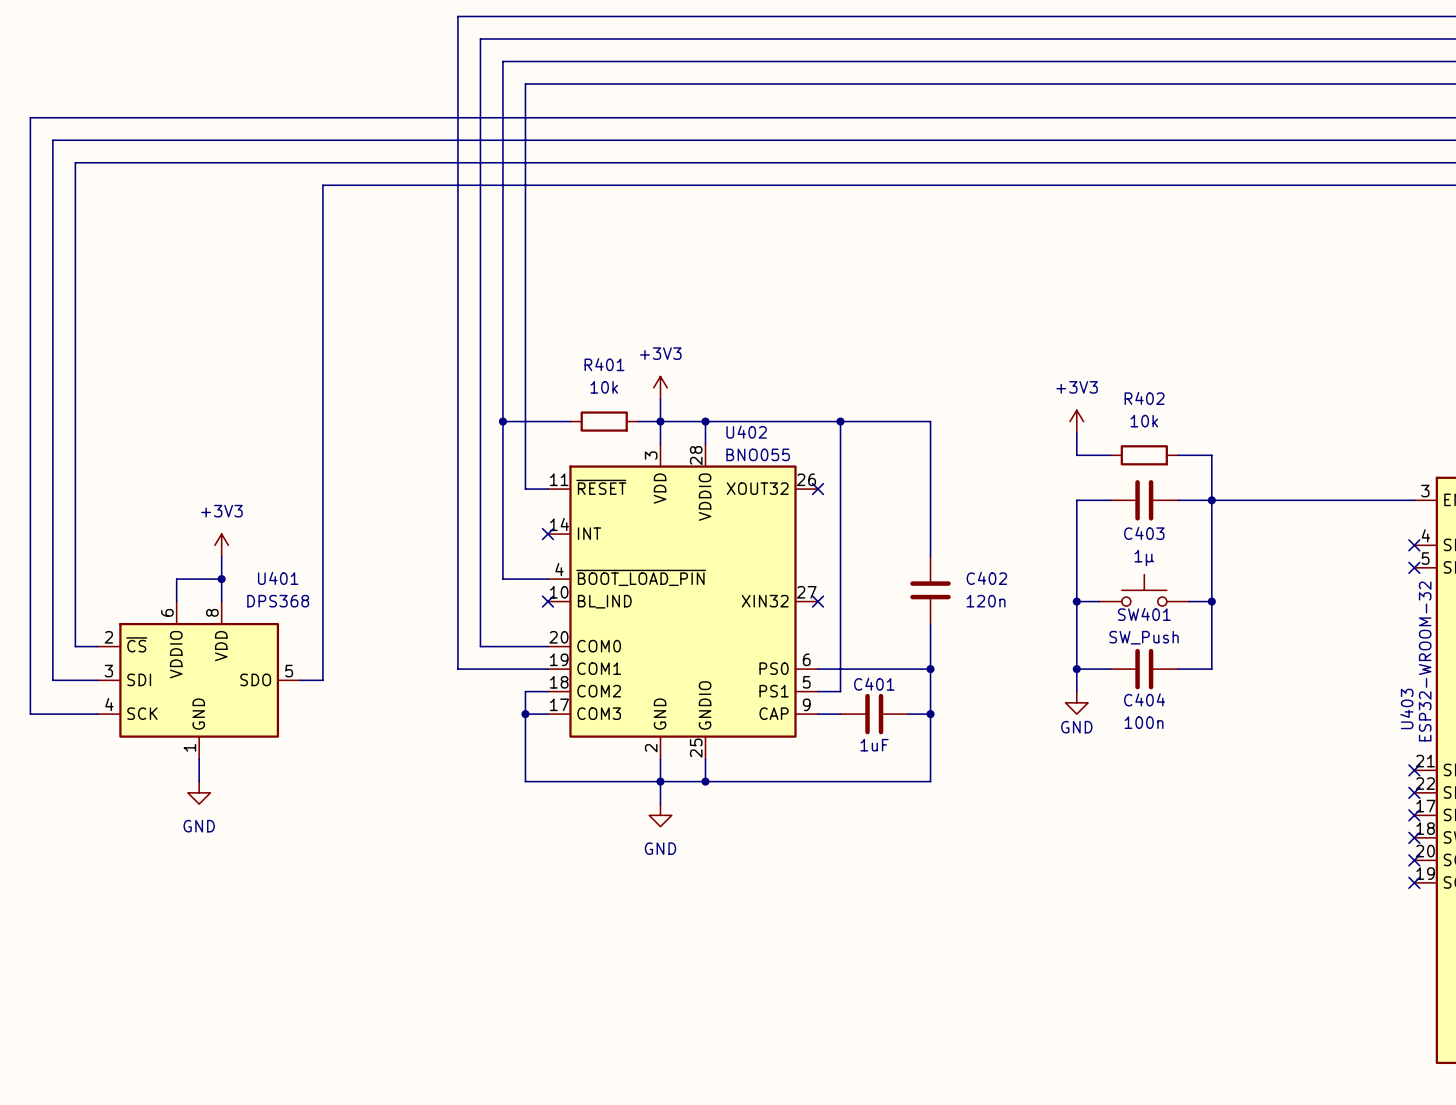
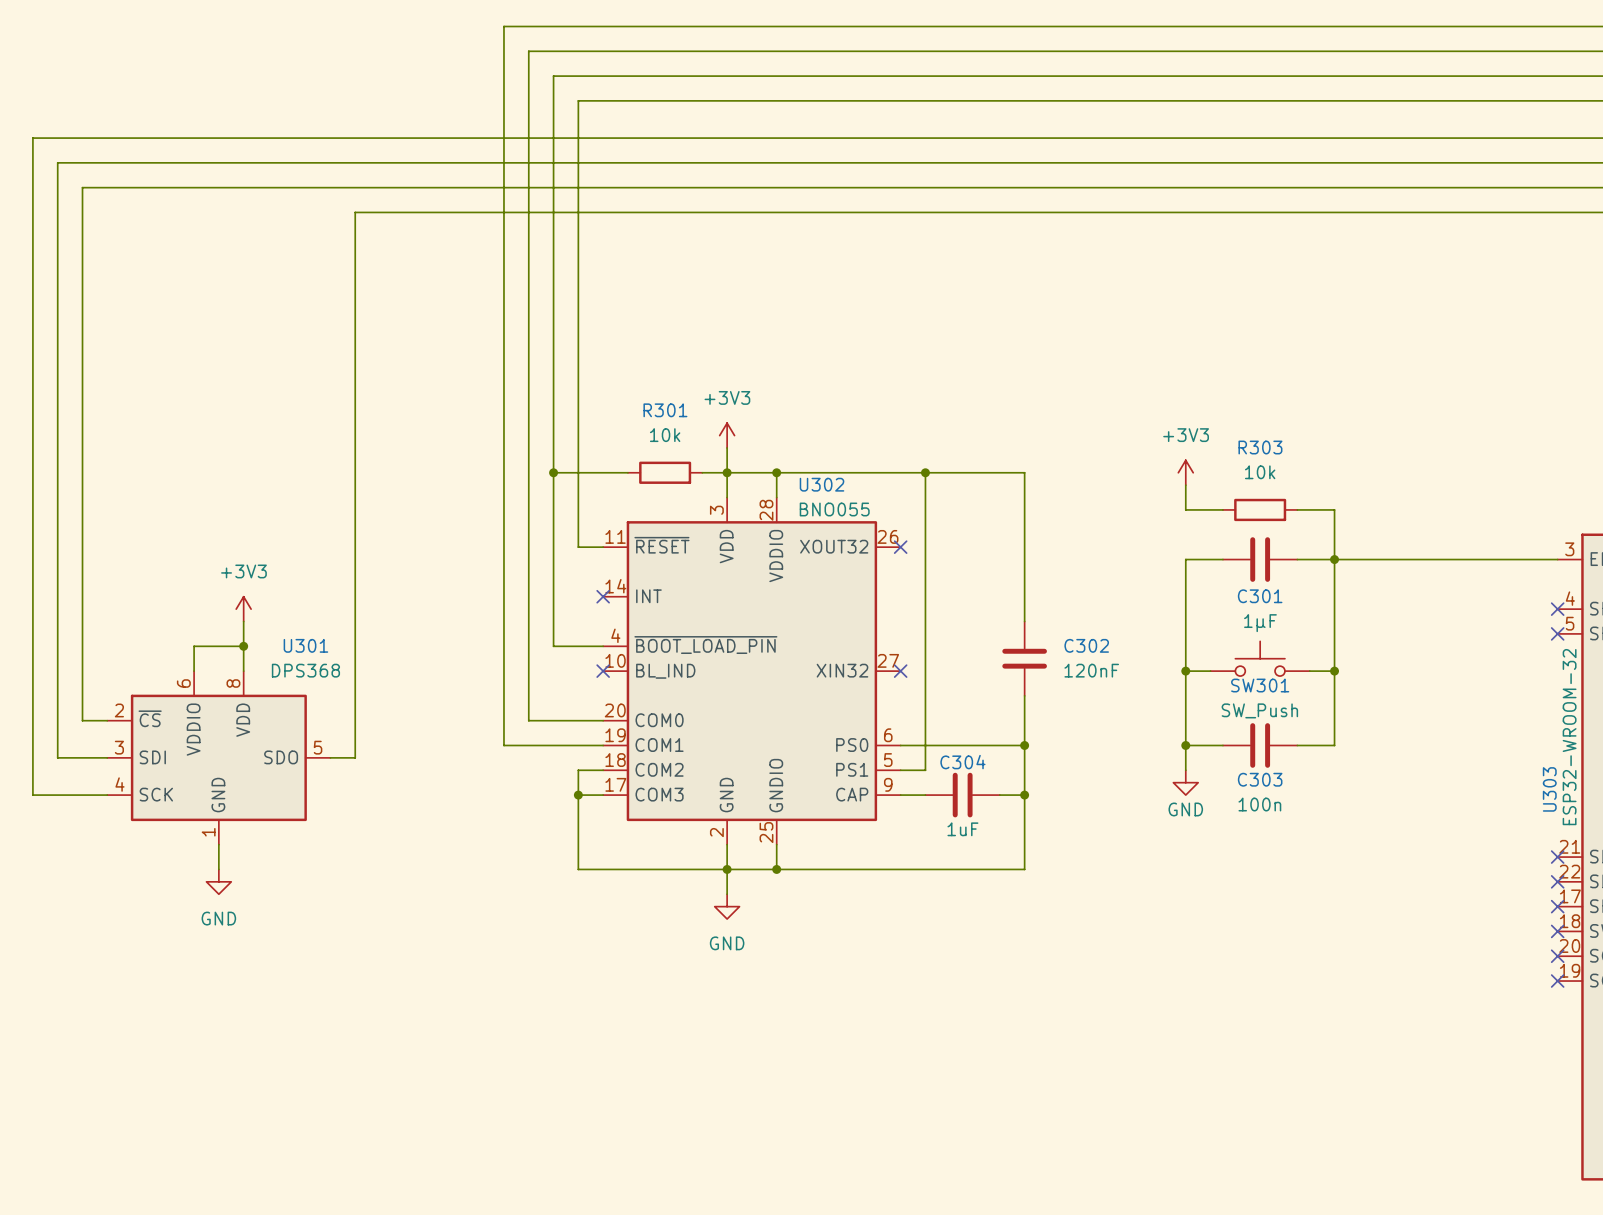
R401 name: R401 (604, 364) -> R301 (665, 410)
R402 name: R402 (1144, 398) -> R303 (1260, 447)
U402 name: U402 (746, 432) -> U302 (822, 484)
C403 name: C403 (1144, 533) -> C301 (1260, 596)
C403 value: 1µ (1144, 558) -> 1µF (1260, 623)
U401 name: U401 (278, 578) -> U301 (305, 645)
C402 name: C402 (986, 578) -> C302 (1086, 645)
C402 value: 120n (986, 601) -> 120nF (1091, 670)
SW401 name: SW401 (1144, 614) -> SW301 (1260, 685)
C401 name: C401 (874, 684) -> C304 (962, 762)
C404 name: C404 (1144, 699) -> C303 (1260, 779)
U403 name: U403 (1406, 708) -> U303 (1549, 789)

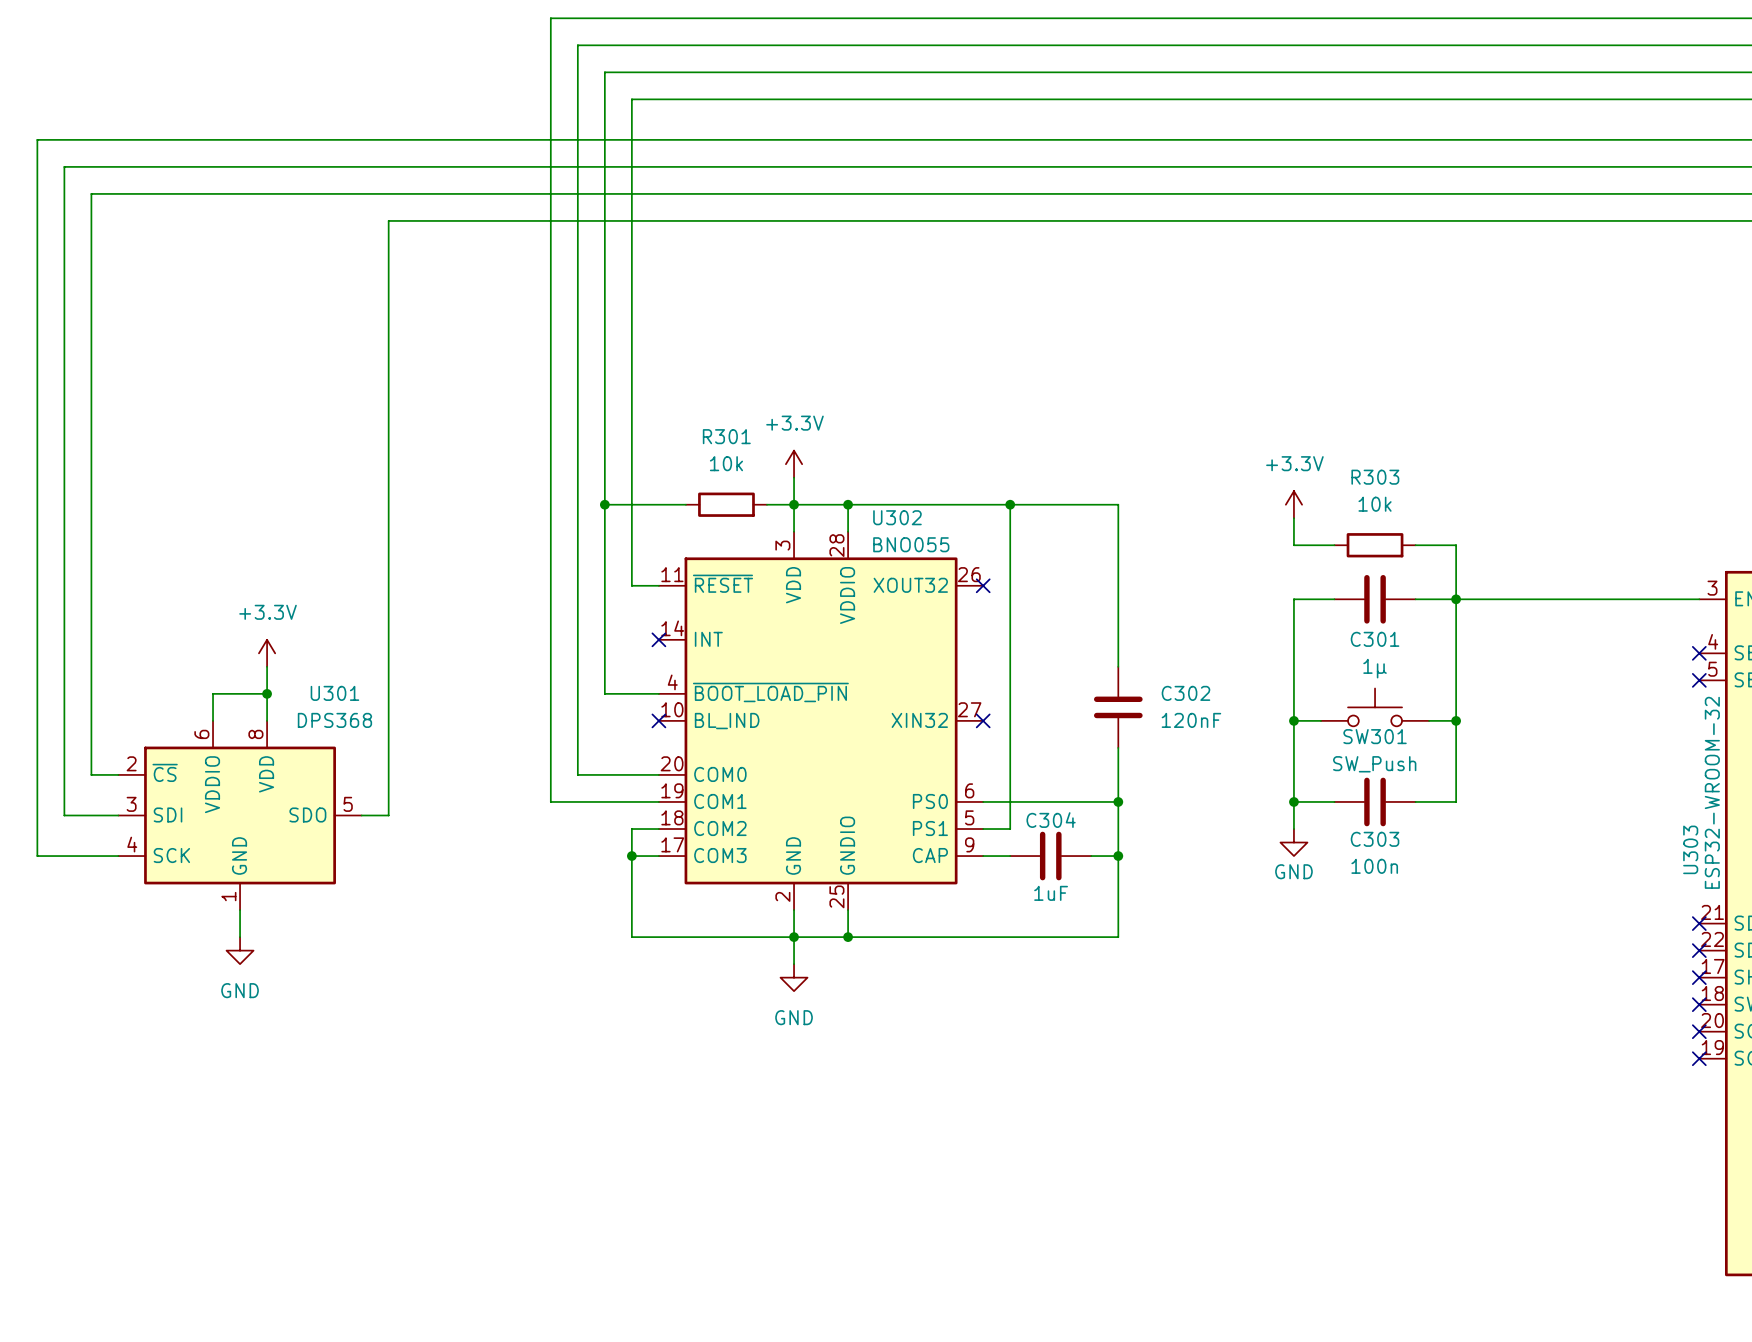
power symbol: +3V3 (727, 435) -> +3.3V (794, 464)
power symbol: +3V3 (1185, 472) -> +3.3V (1293, 504)
power symbol: +3V3 (243, 609) -> +3.3V (267, 653)
C301 value: 1µF (1260, 623) -> 1µ (1375, 668)

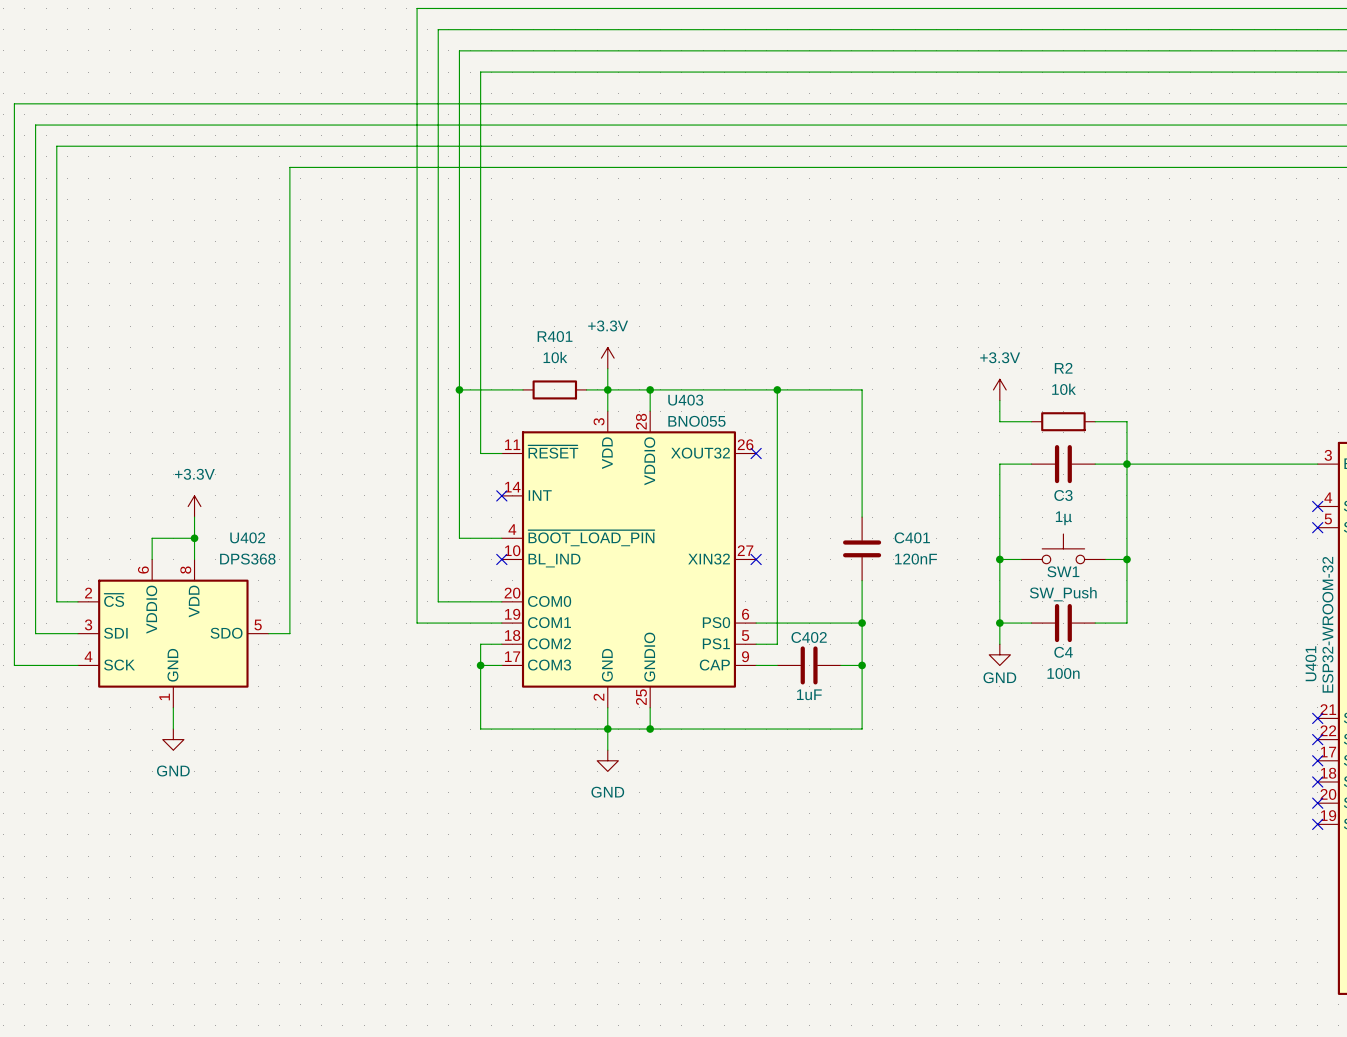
R301 name: R301 (726, 436) -> R401 (555, 336)
R303 name: R303 (1375, 477) -> R2 (1063, 368)
U302 name: U302 (897, 517) -> U403 (685, 400)
C301 name: C301 (1375, 639) -> C3 (1063, 495)
U301 name: U301 (334, 693) -> U402 (247, 537)
C302 name: C302 (1185, 693) -> C401 (912, 537)
SW301 name: SW301 (1375, 736) -> SW1 (1063, 571)
C304 name: C304 (1051, 820) -> C402 (809, 637)
C303 name: C303 (1375, 839) -> C4 (1063, 652)
U303 name: U303 (1690, 849) -> U401 (1310, 663)

